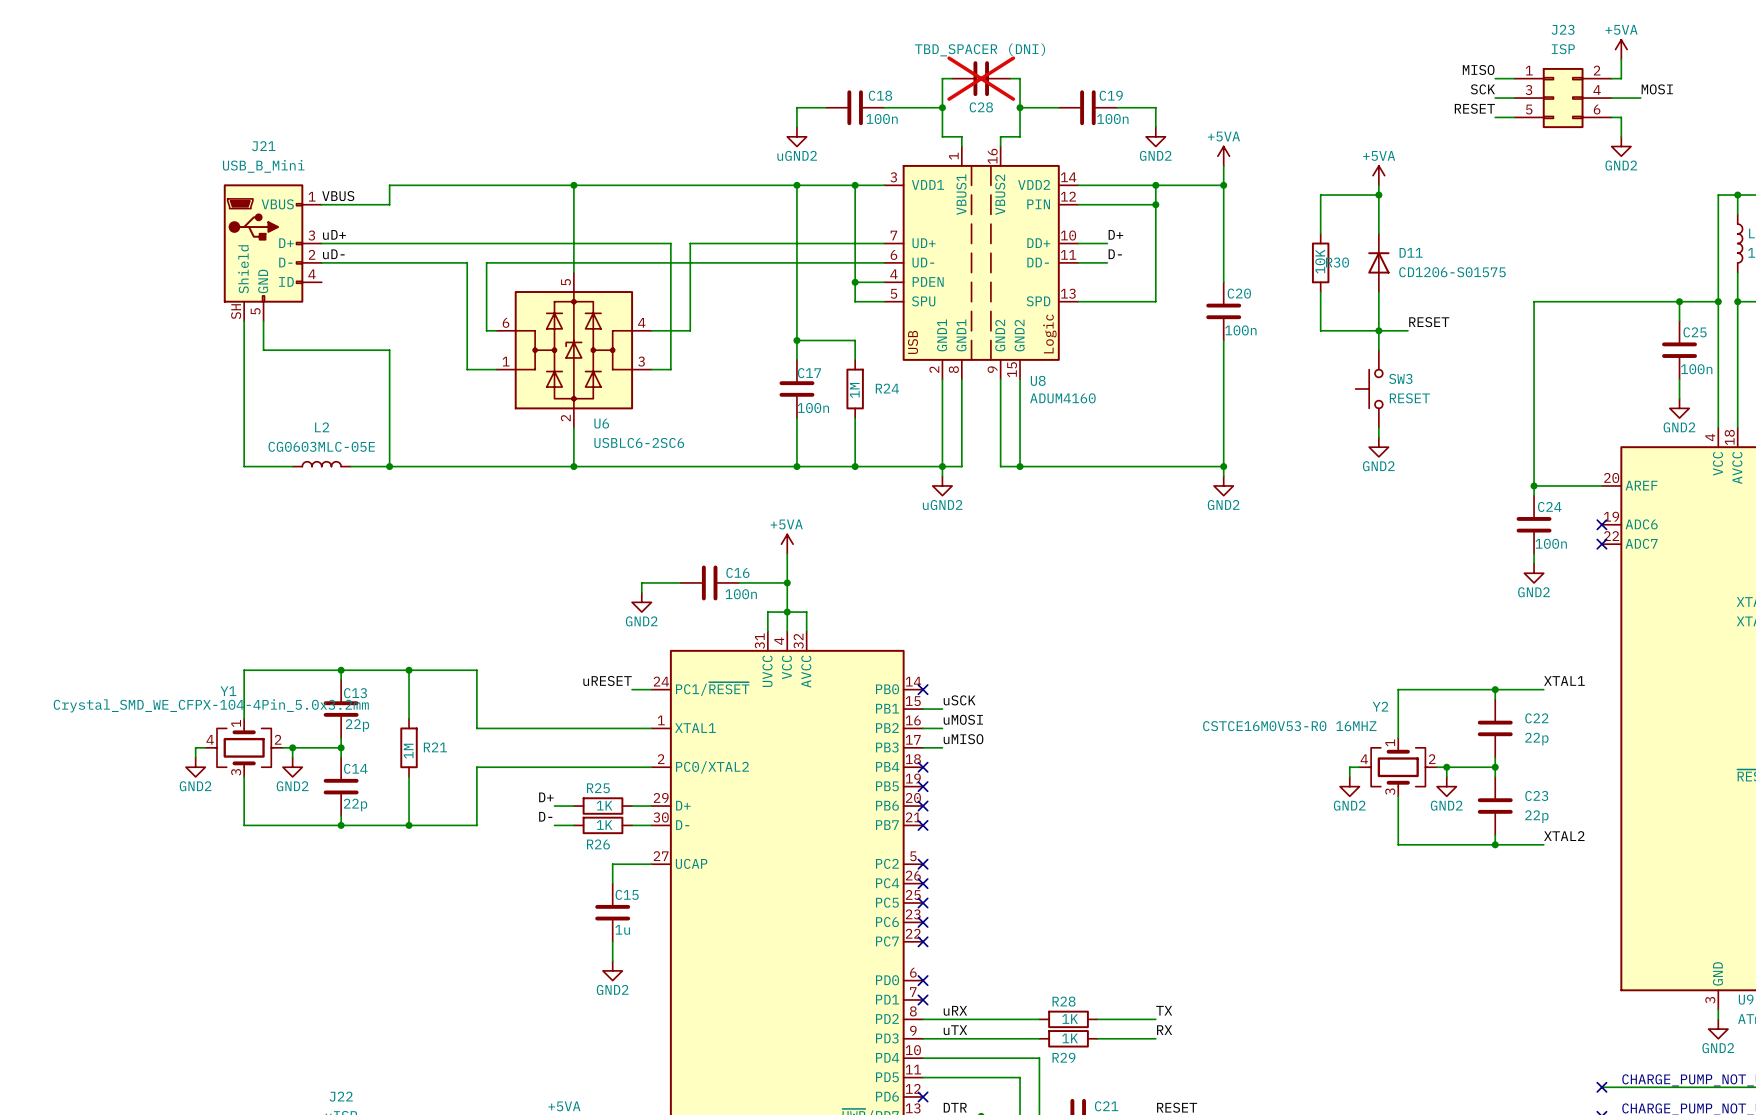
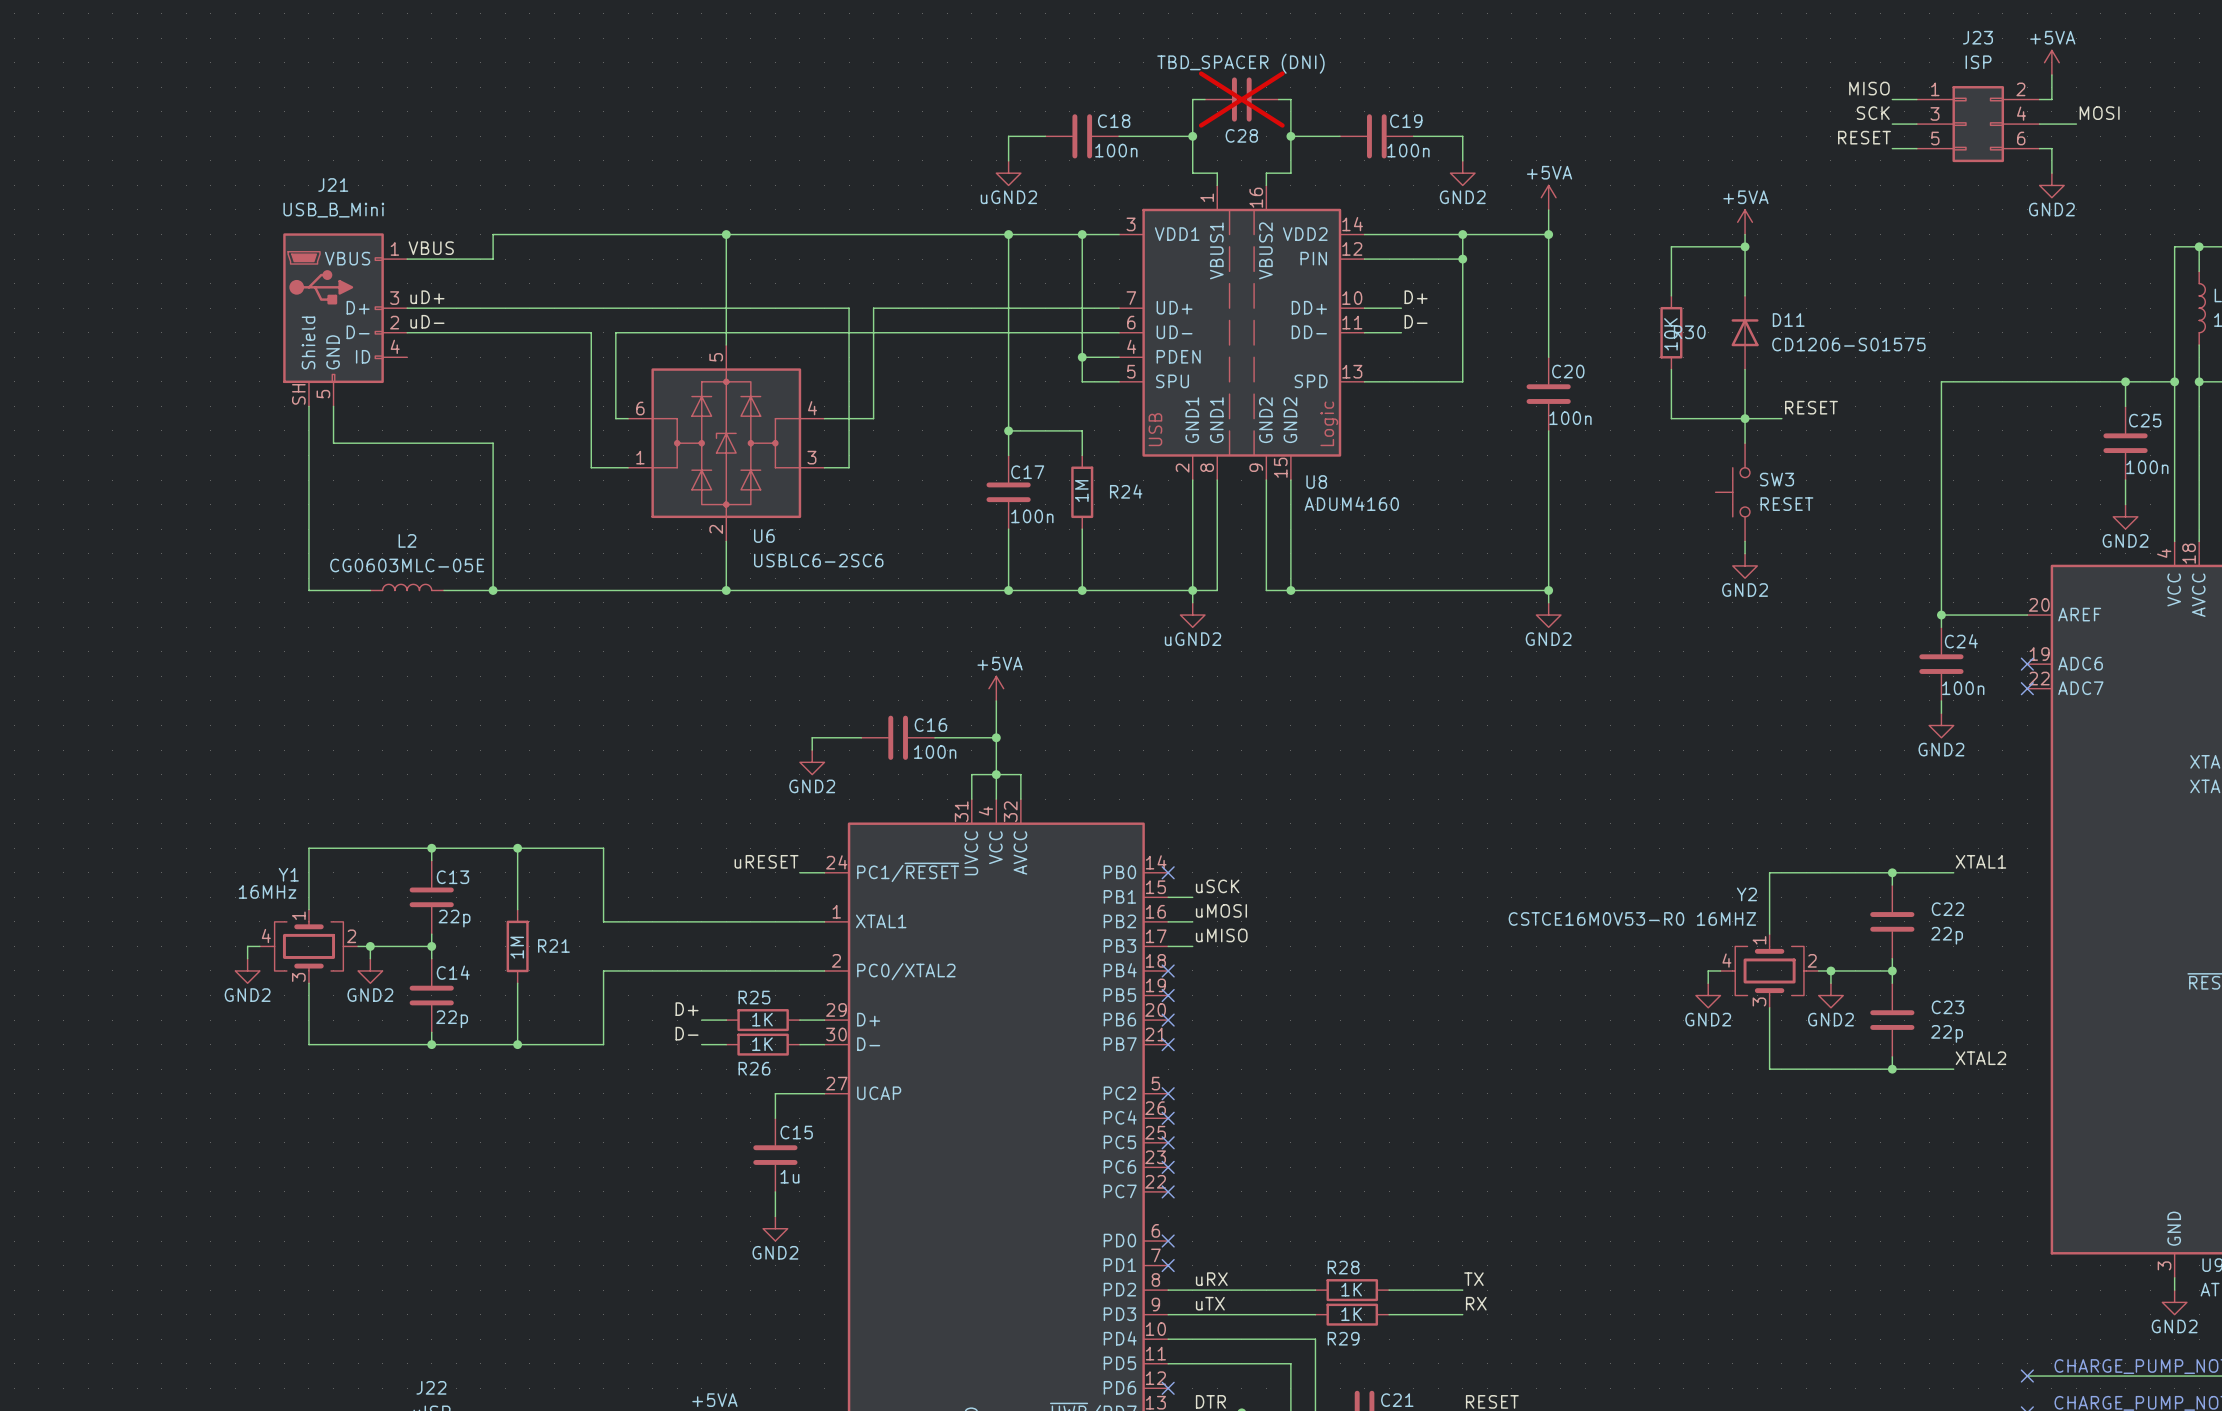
Y1 value: Crystal_SMD_WE_CFPX-104-4Pin_5.0x3.2mm (211, 705) -> 16MHz (267, 891)

